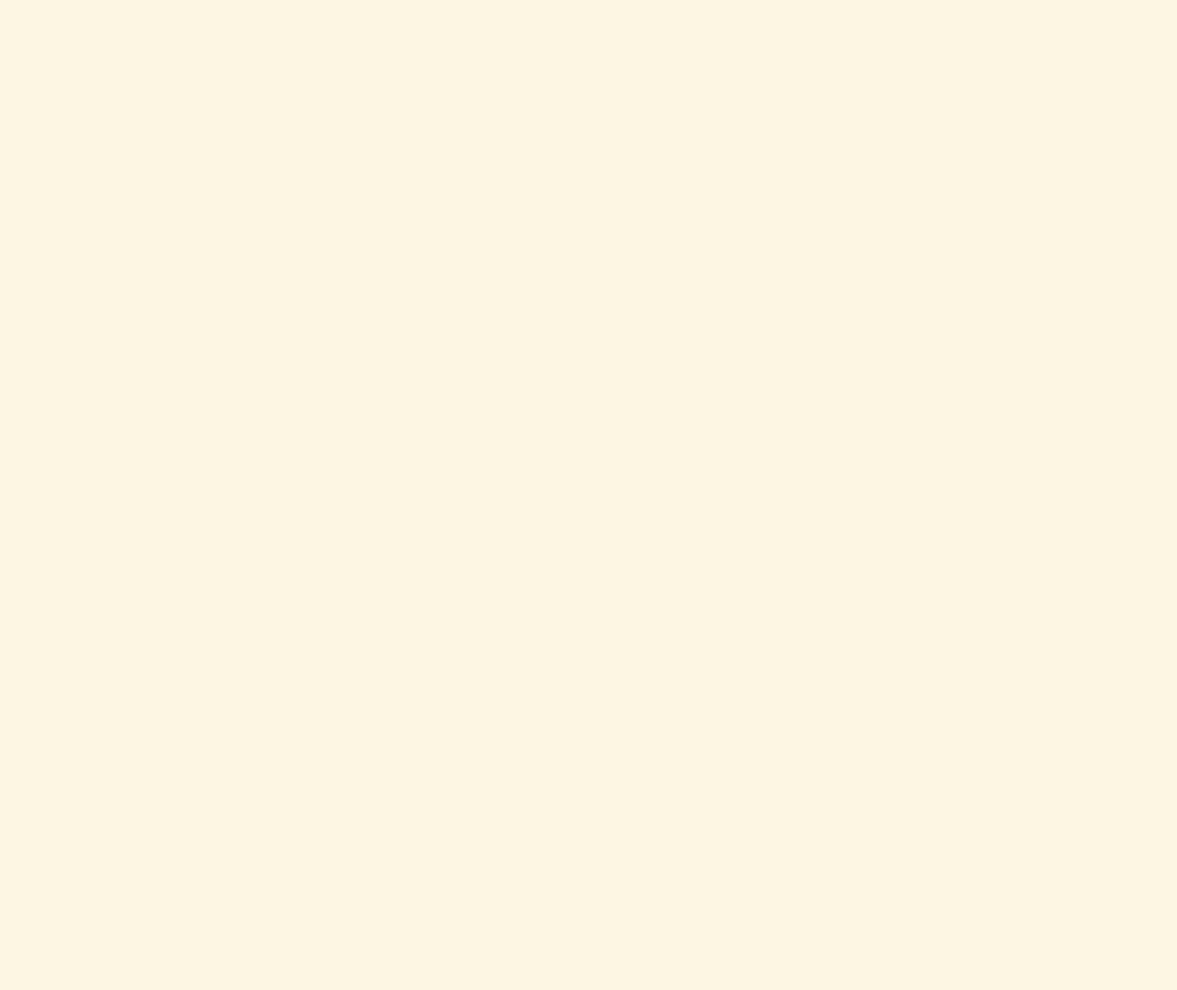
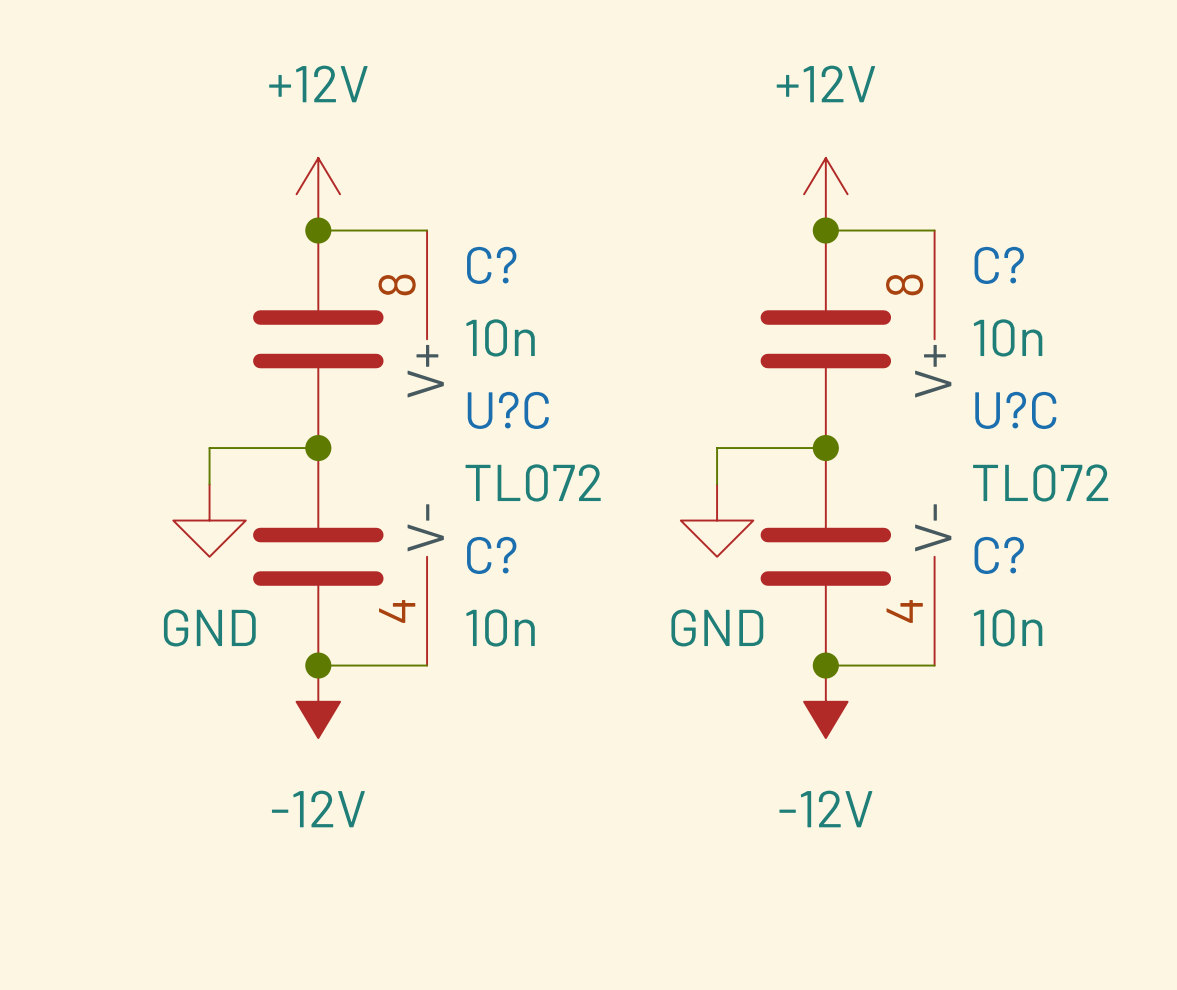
power symbol: none -> +12V (318, 194)
power symbol: none -> +12V (825, 194)
wire: none -> (318, 230) (427, 230)
junction: none -> (318, 230)
wire: none -> (825, 230) (934, 230)
junction: none -> (825, 230)
C?: none -> 10n (318, 339)
C?: none -> 10n (825, 339)
wire: none -> (318, 448) (209, 448) (209, 484)
junction: none -> (318, 448)
U?C: none -> TL072 (427, 448)
wire: none -> (825, 448) (717, 448) (717, 484)
junction: none -> (825, 448)
U?C: none -> TL072 (934, 448)
power symbol: none -> GND (209, 520)
power symbol: none -> GND (717, 520)
C?: none -> 10n (318, 556)
C?: none -> 10n (825, 556)
wire: none -> (318, 665) (427, 665)
junction: none -> (318, 665)
wire: none -> (825, 665) (934, 665)
junction: none -> (825, 665)
power symbol: none -> -12V (318, 701)
power symbol: none -> -12V (825, 701)

